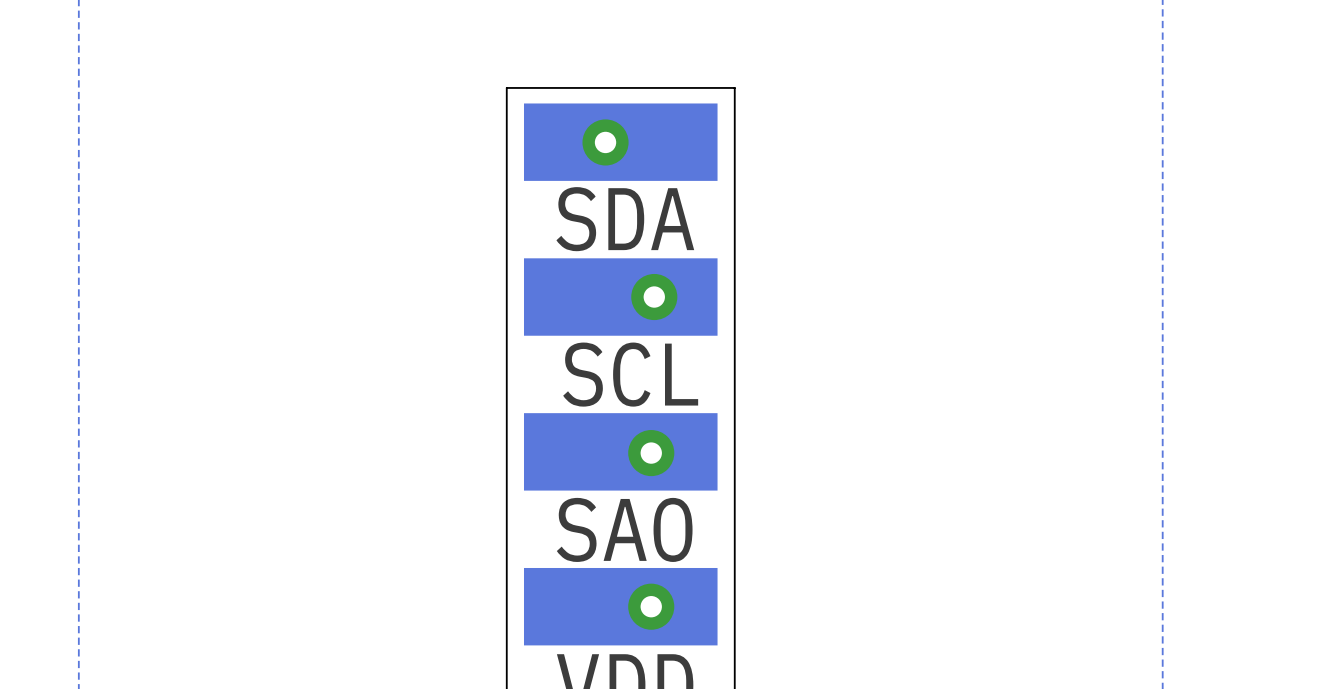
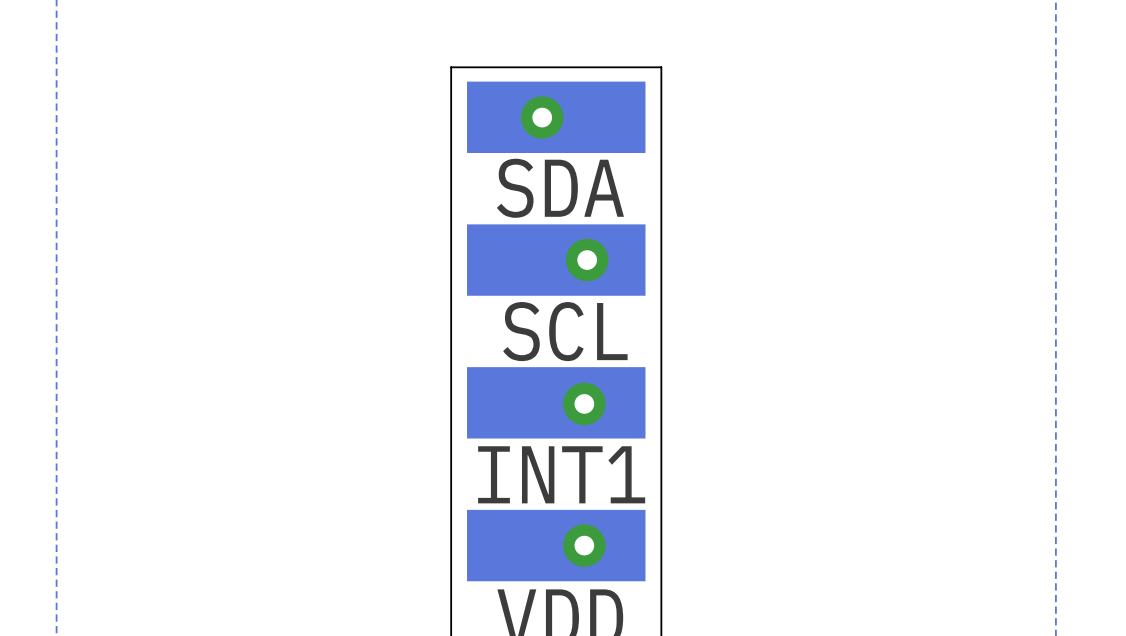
text: SAO (624, 529) -> INT1 (561, 474)

